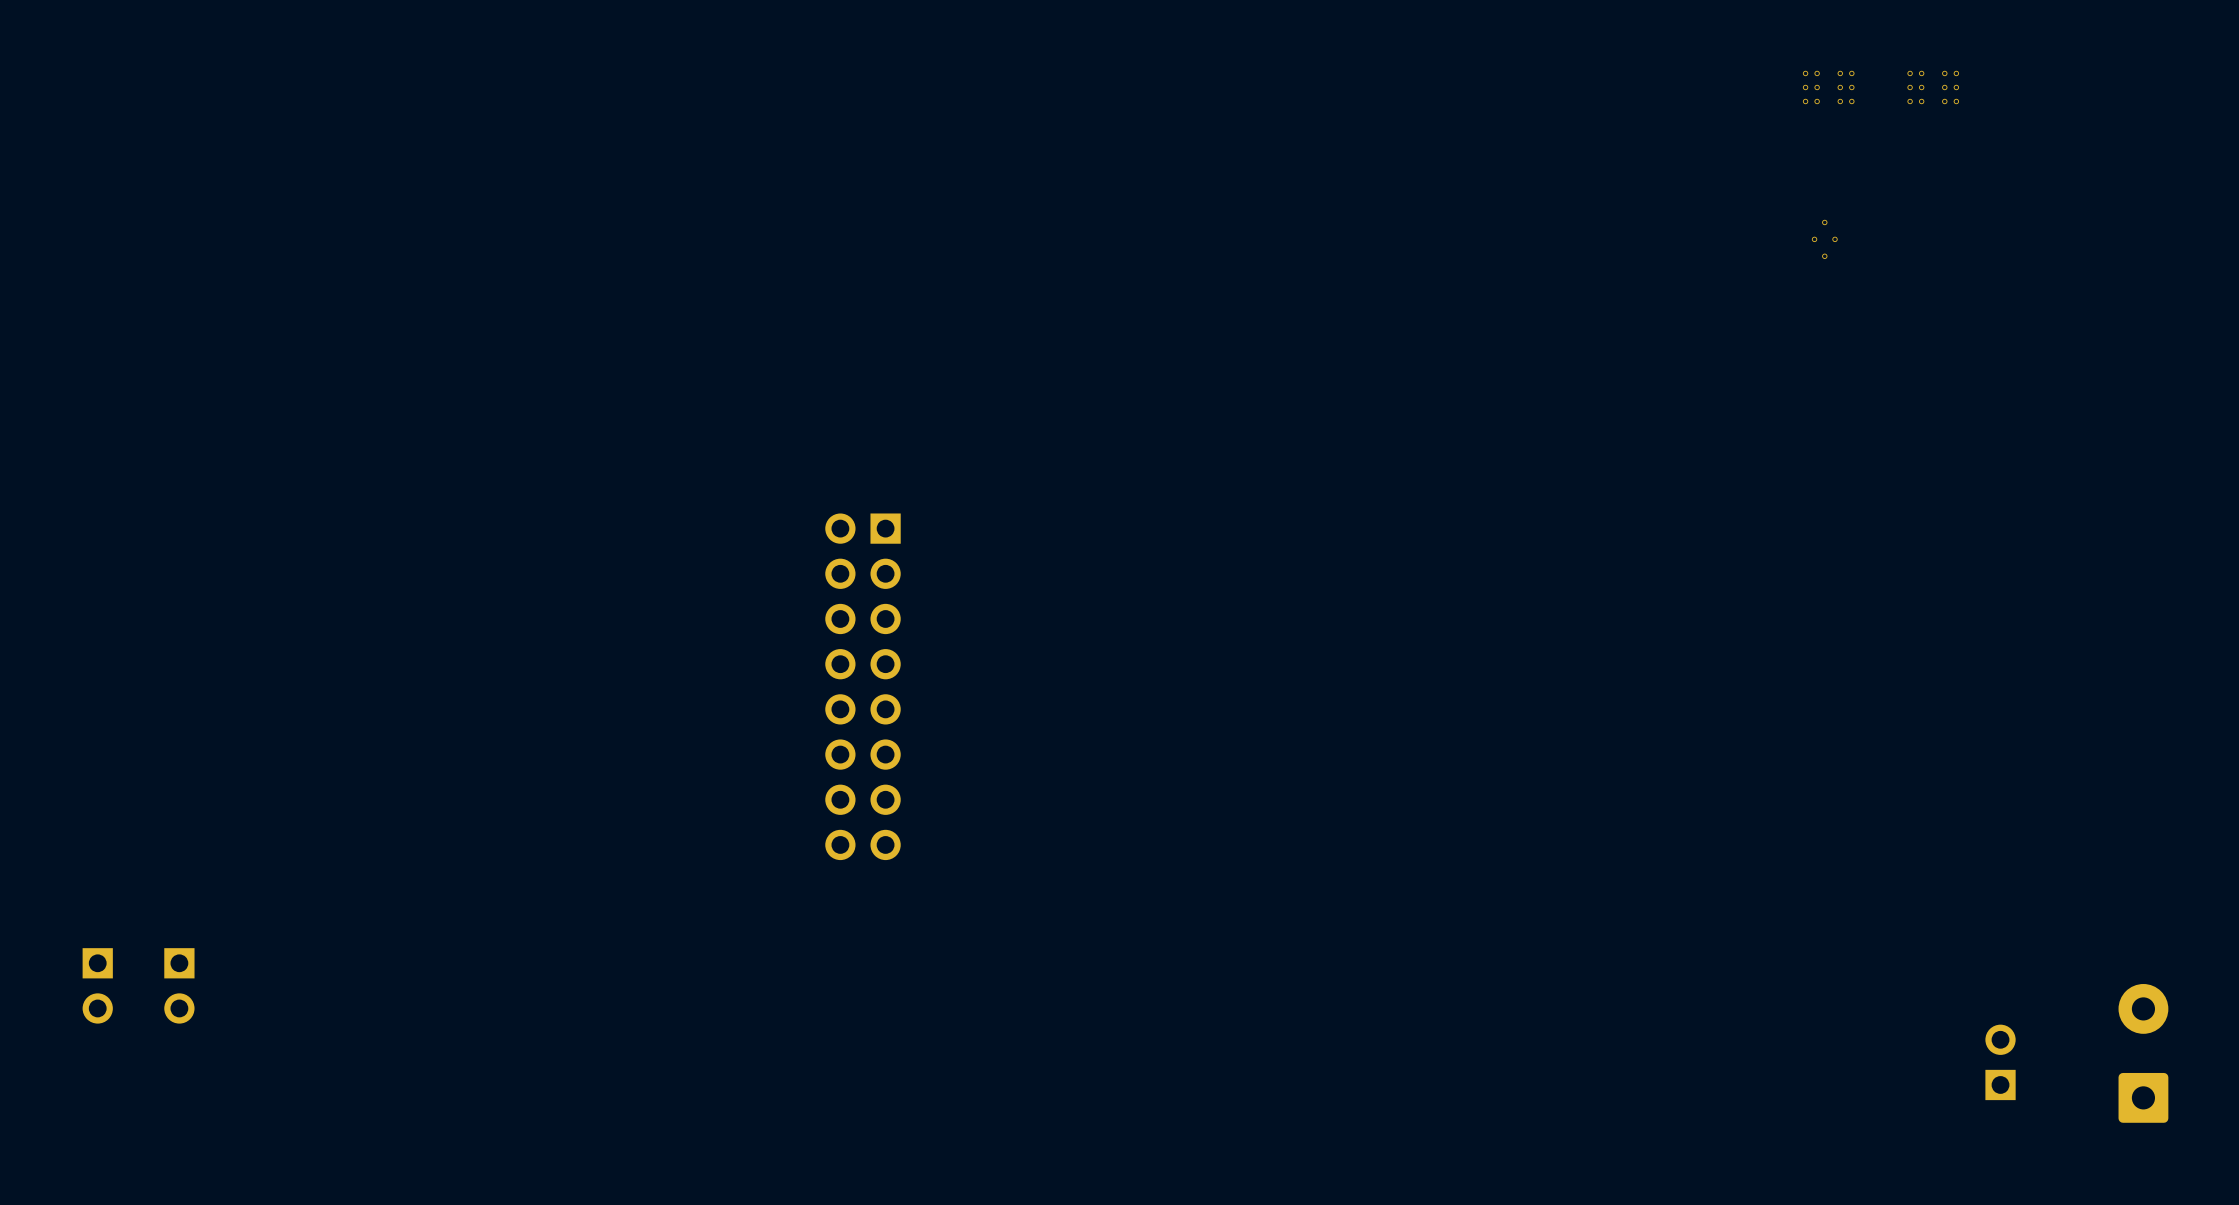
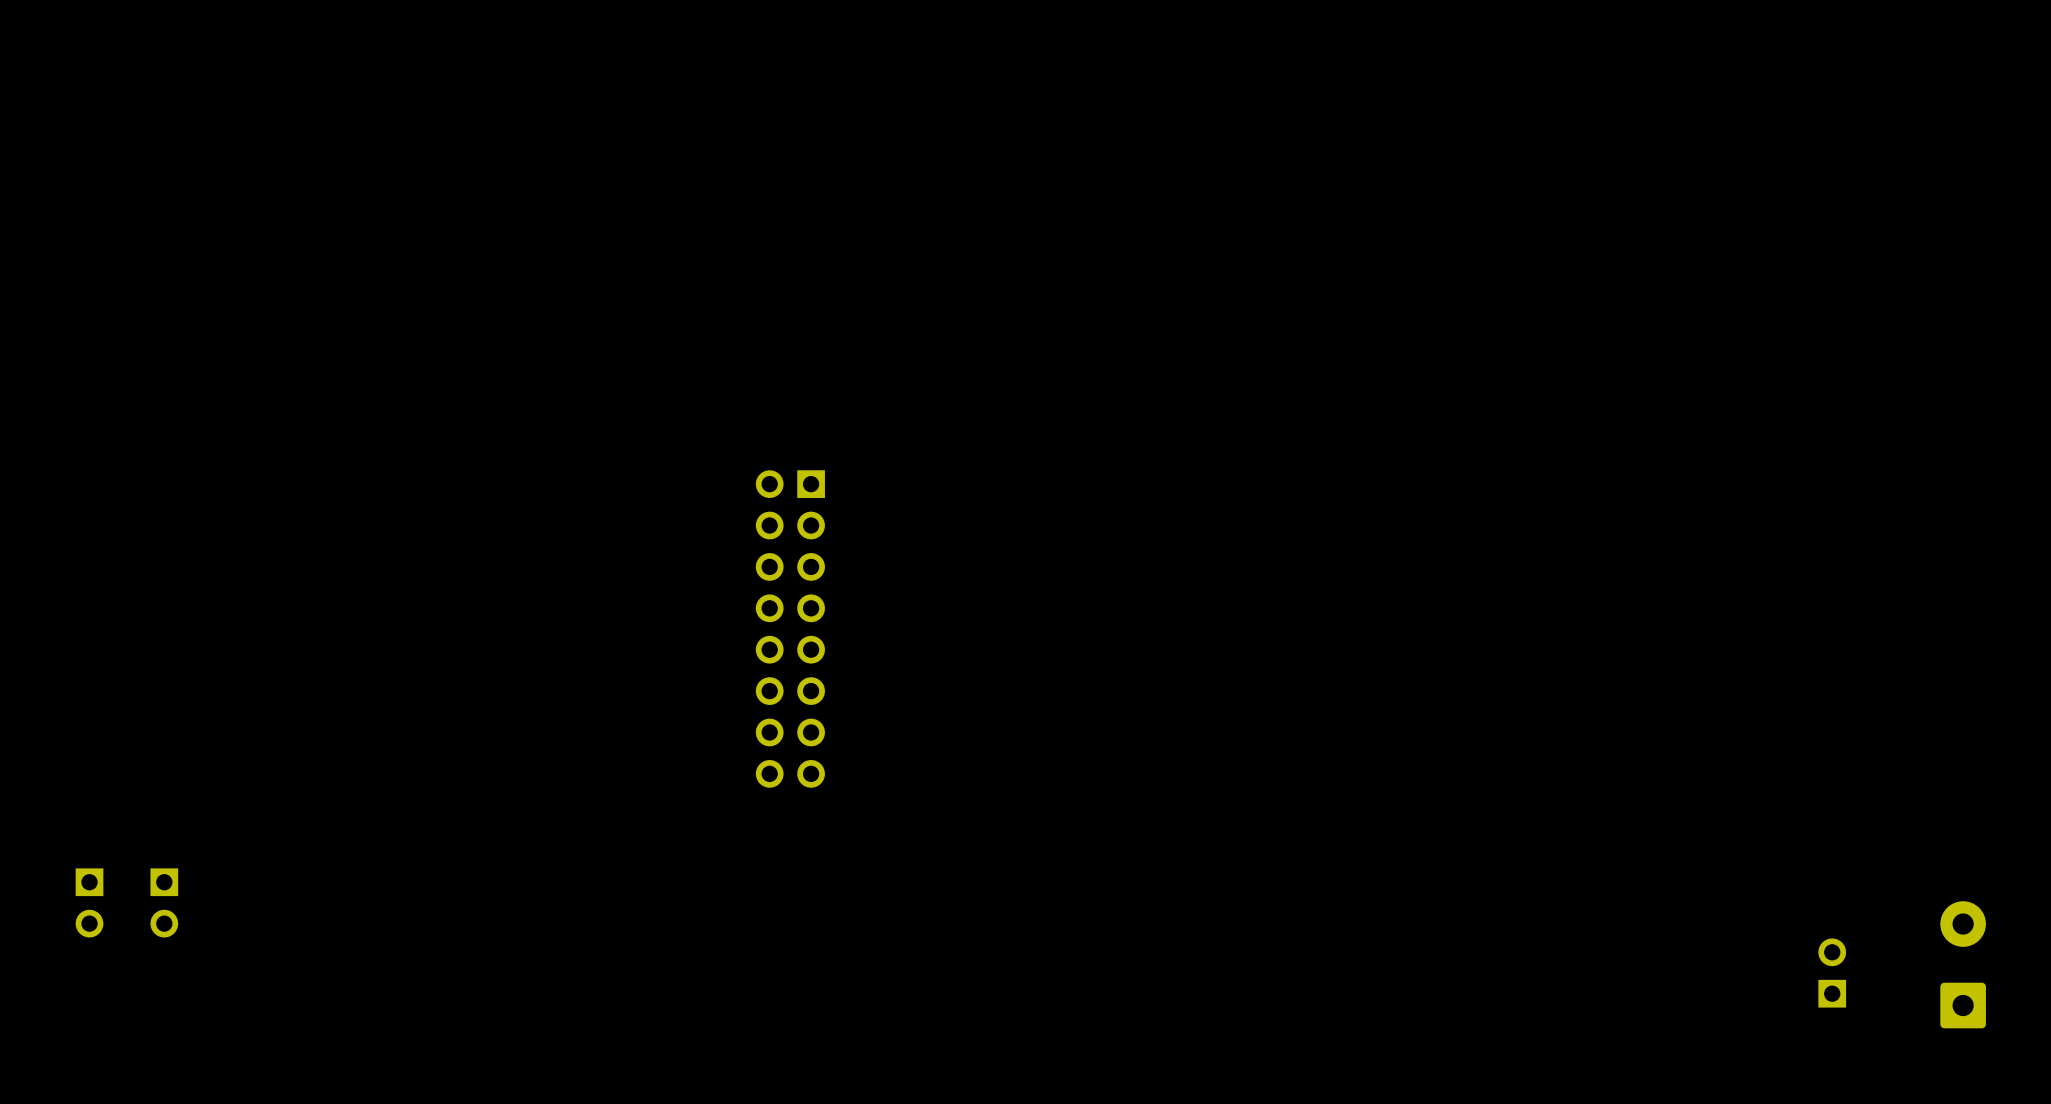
part: (1828, 87) -> none
part: (1933, 87) -> none
part: (1824, 239) -> none

